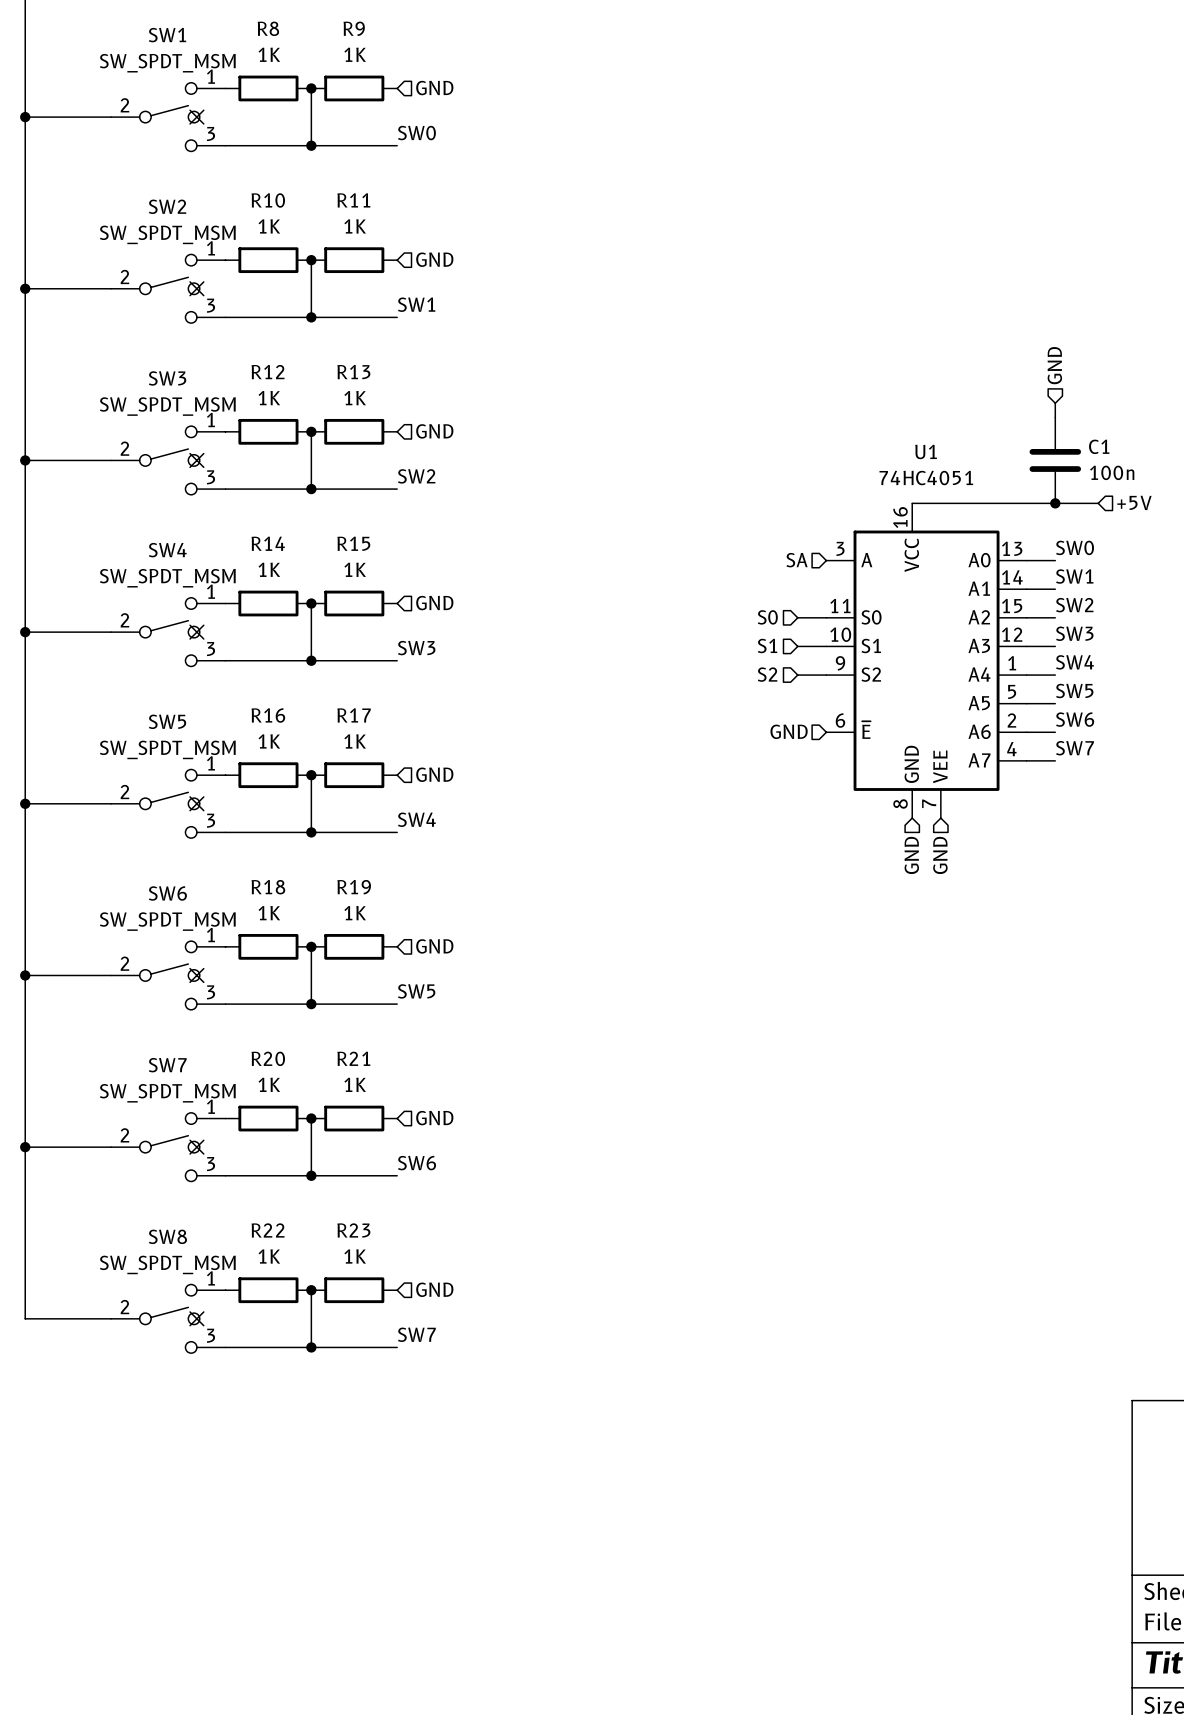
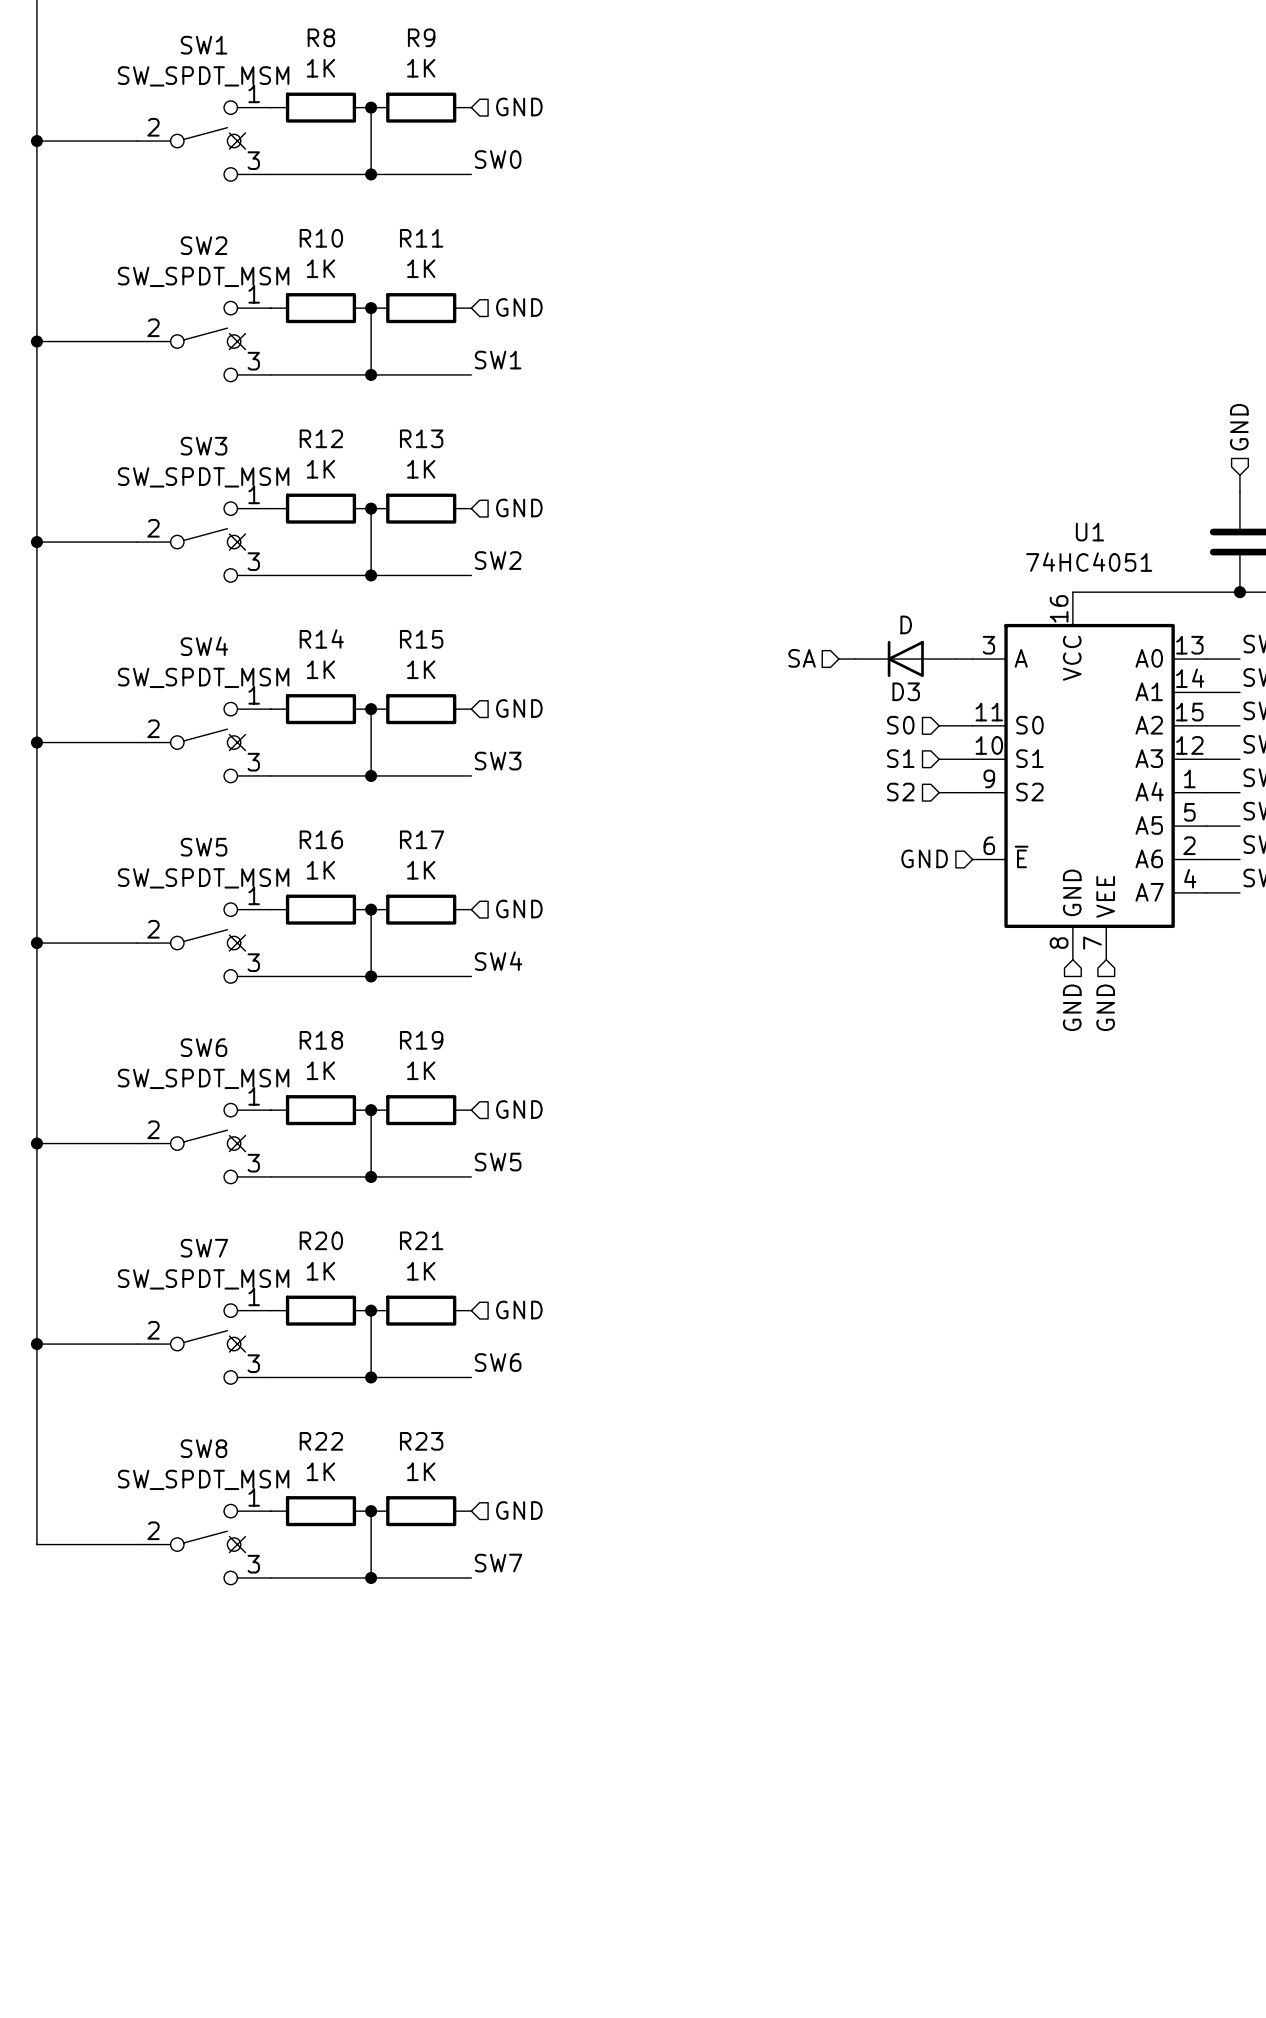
wire: none -> (838, 659) (855, 659)
D3: none -> D (905, 659)
hierarchical label position: SA (797, 560) -> SA (802, 658)
wire: none -> (955, 659) (972, 659)

